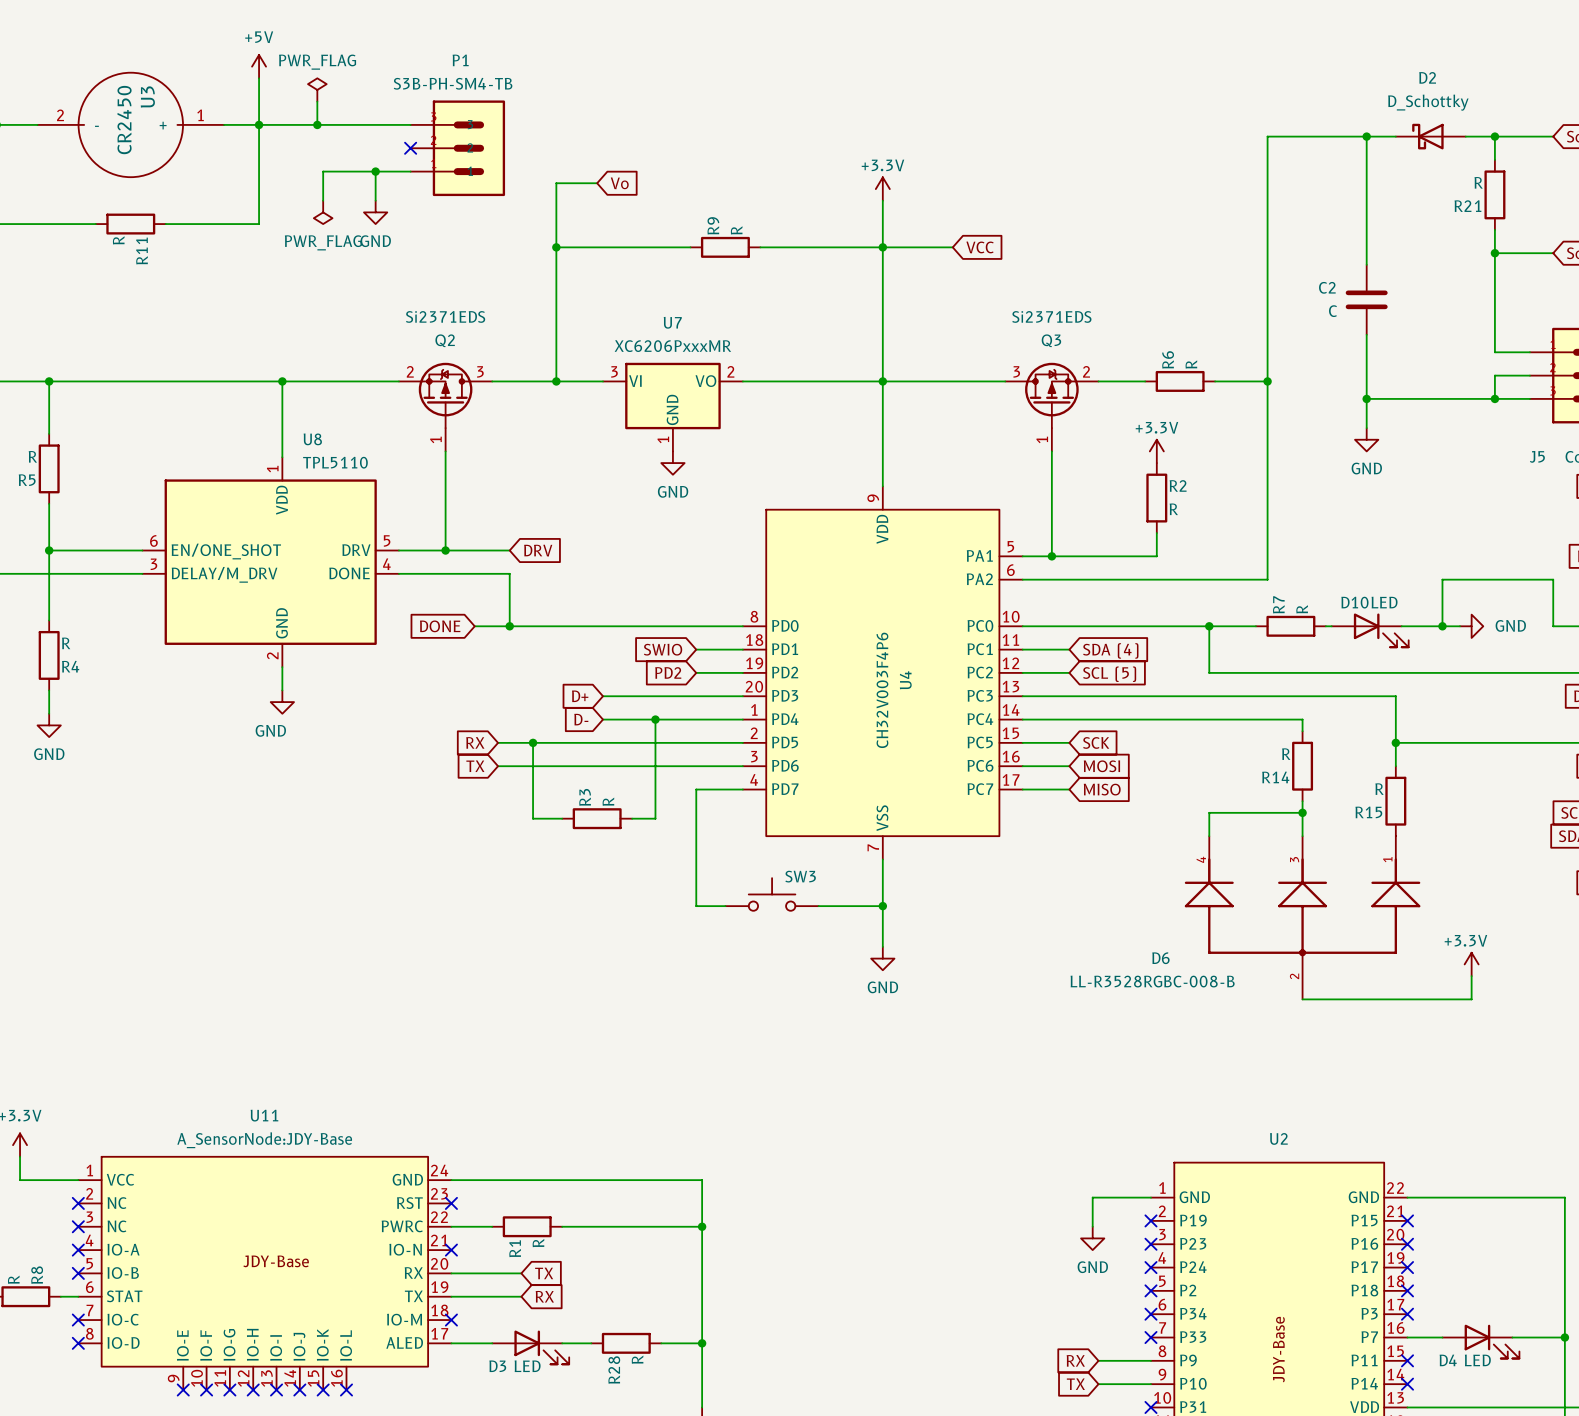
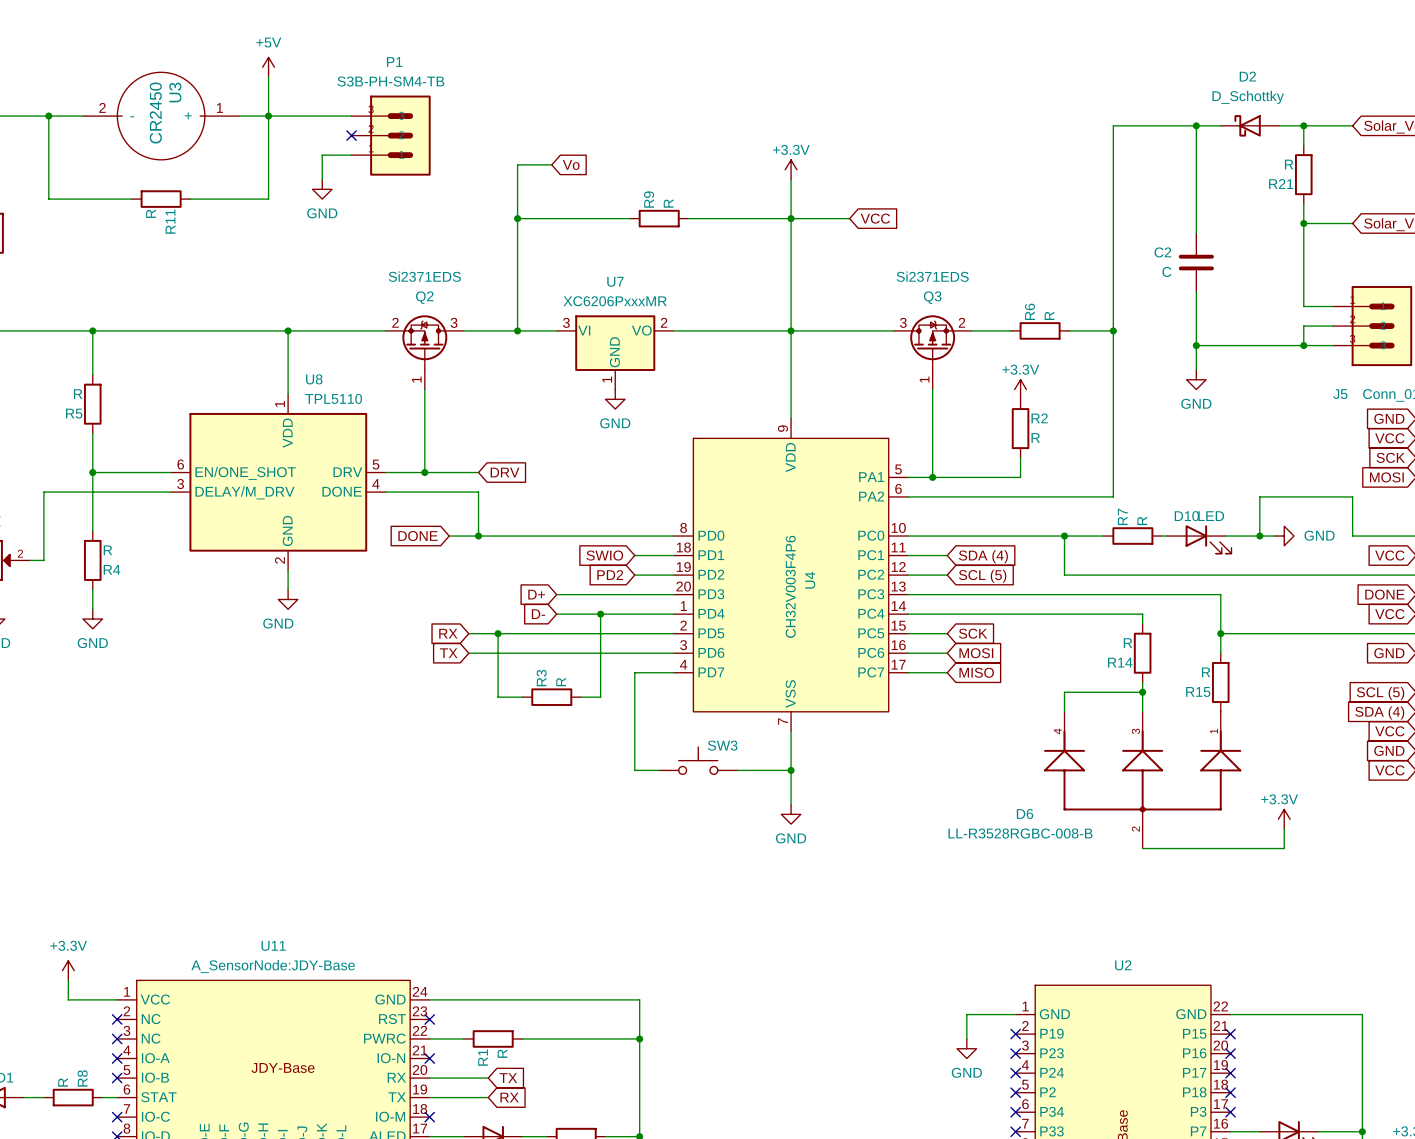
power symbol: PWR_FLAG (317, 89) -> none
wire: (317, 101) (317, 124) -> none
junction: (317, 124) -> none
no-connect mark position: (410, 148) -> (351, 135)
P1 position: (457, 148) -> (391, 135)
wire: (375, 171) (375, 200) -> none
junction: (375, 171) -> none
power symbol: PWR_FLAG (323, 212) -> GND (322, 189)
power symbol: GND (375, 212) -> none

